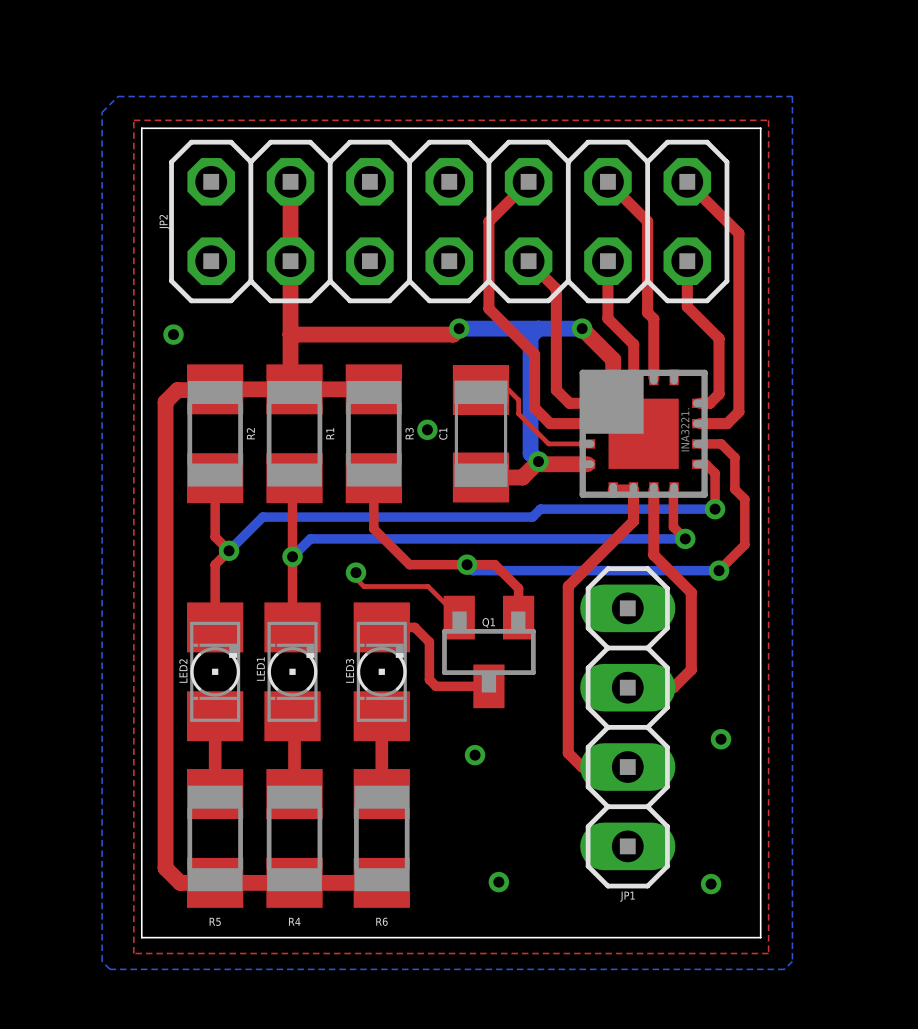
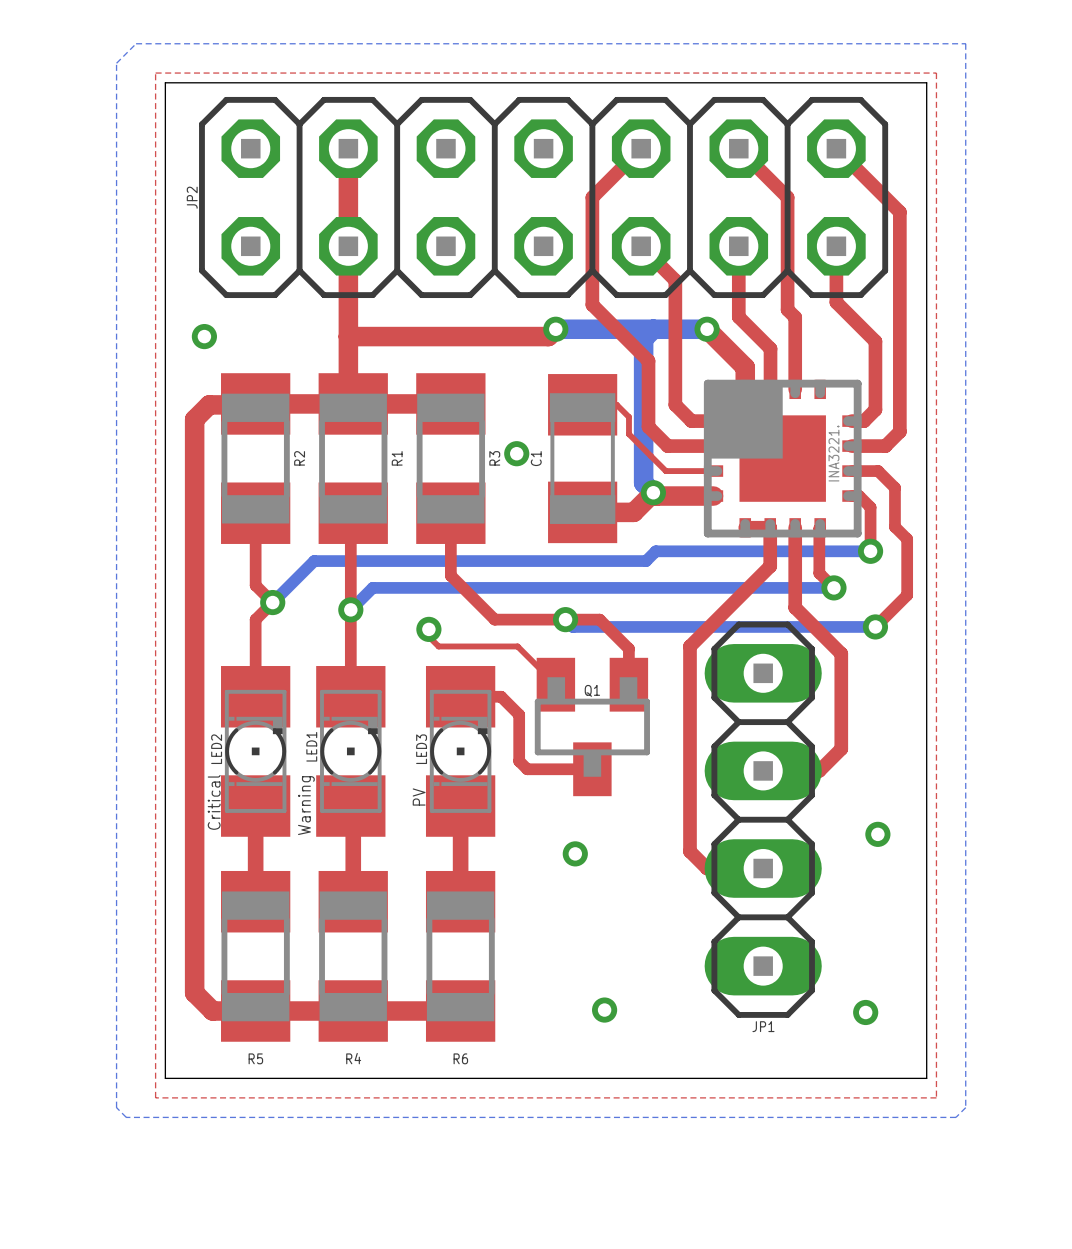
text: none -> PV (419, 797)
text: none -> Critical (214, 802)
text: none -> Warning (306, 805)

